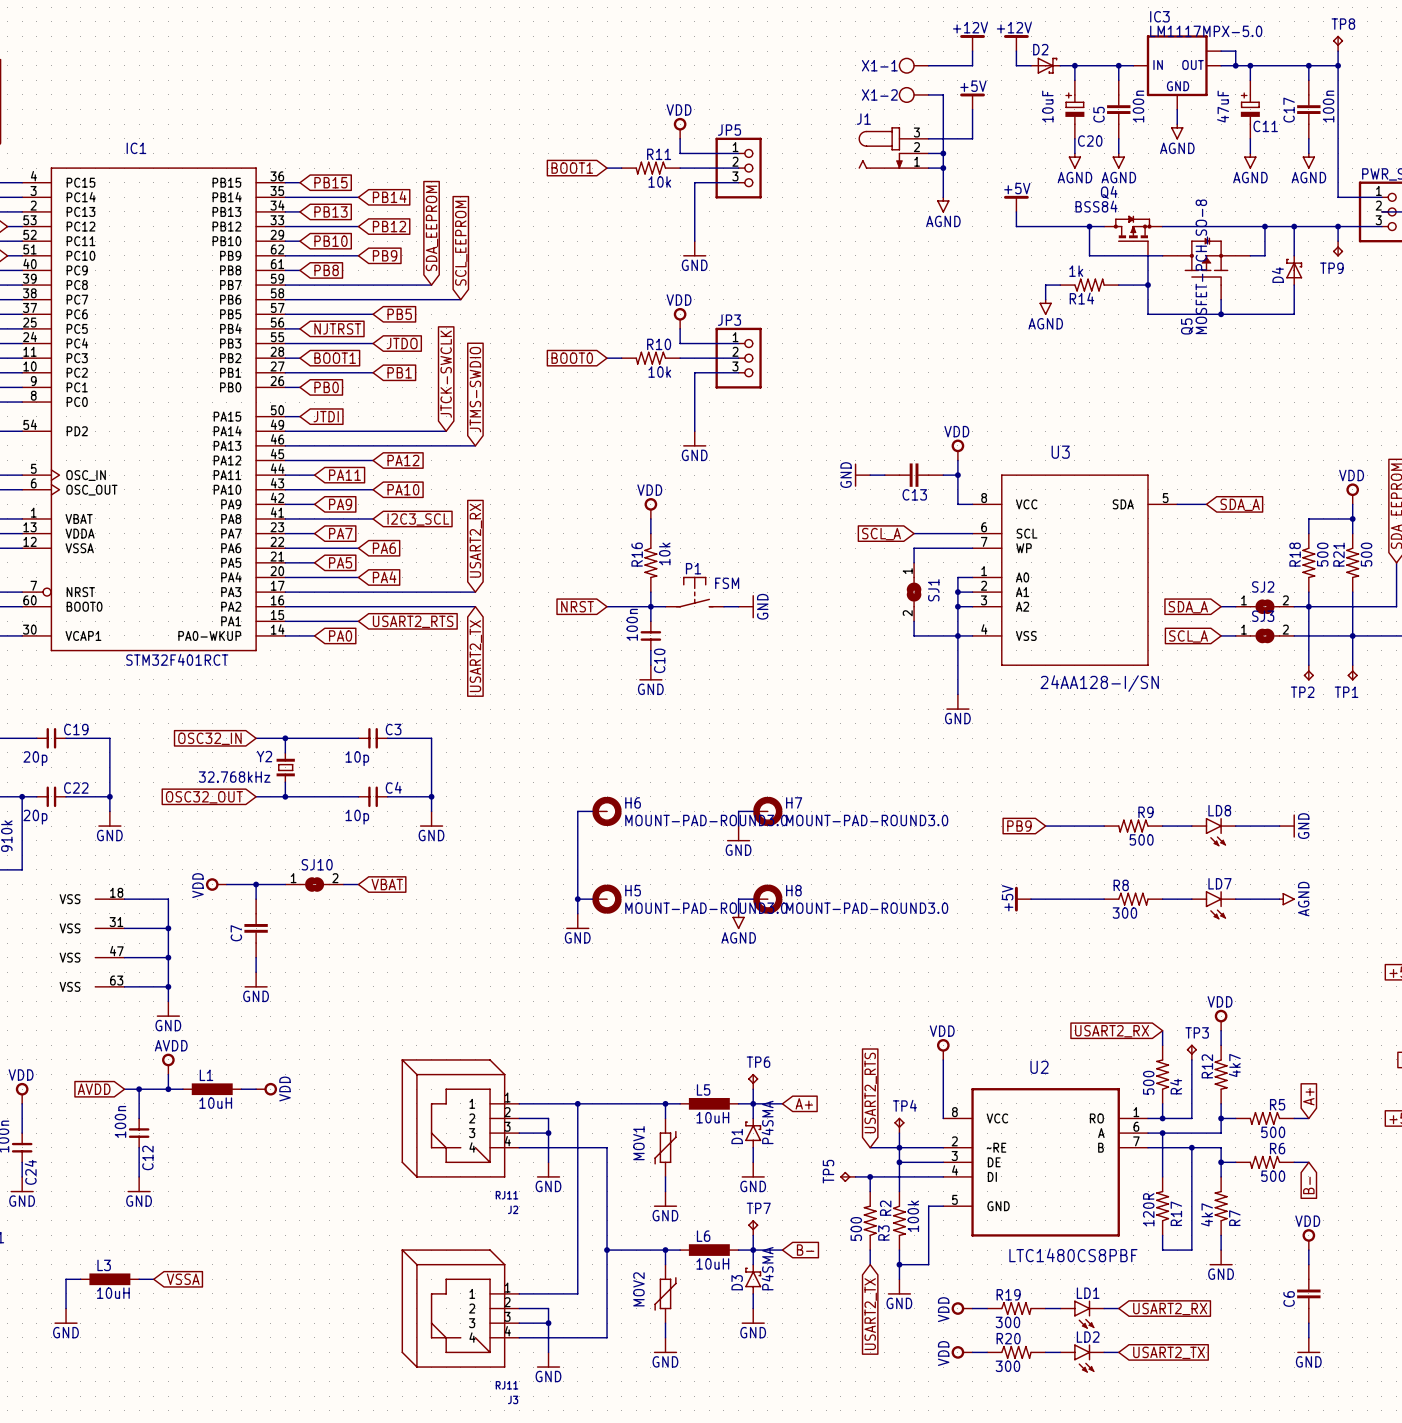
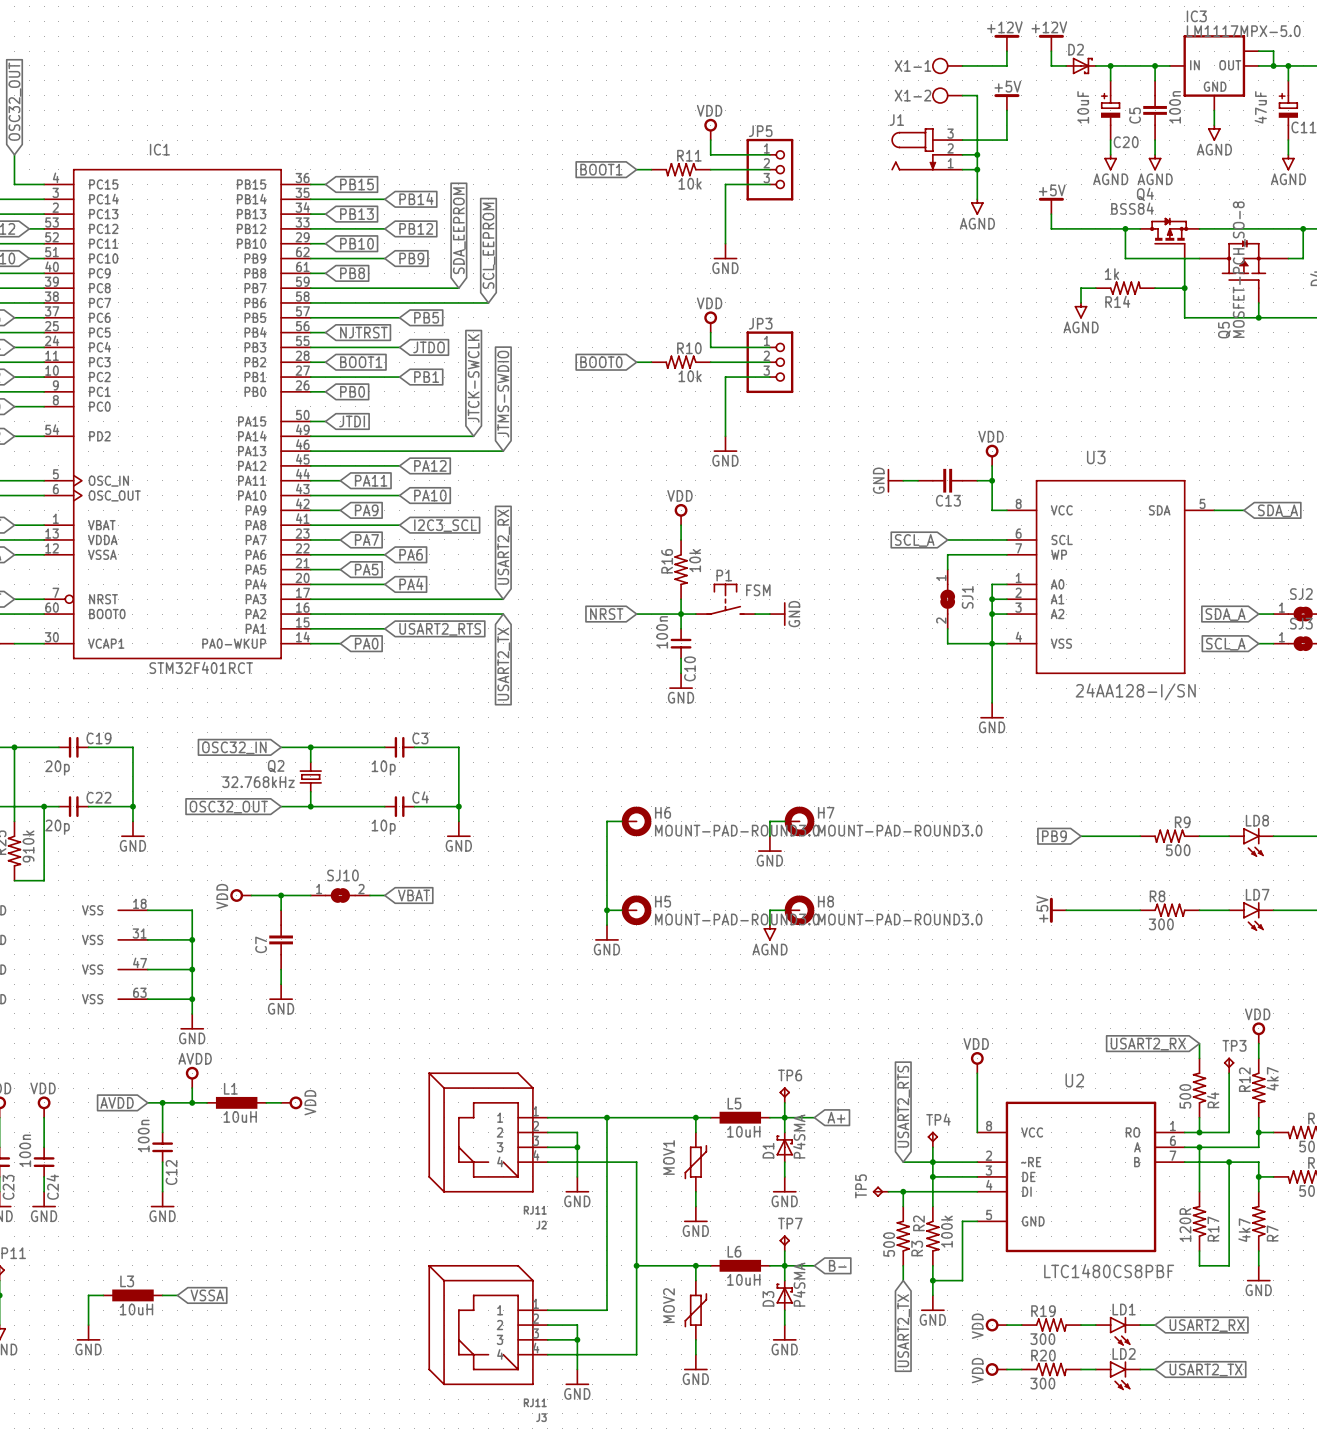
Y2: 32.768kHz (285, 767) -> none
Q2: none -> 32.768kHz (310, 776)
D1 symbol: [745, 1117, 762, 1149] -> [776, 1132, 793, 1163]
D3 symbol: [745, 1263, 762, 1295] -> [776, 1280, 793, 1311]

